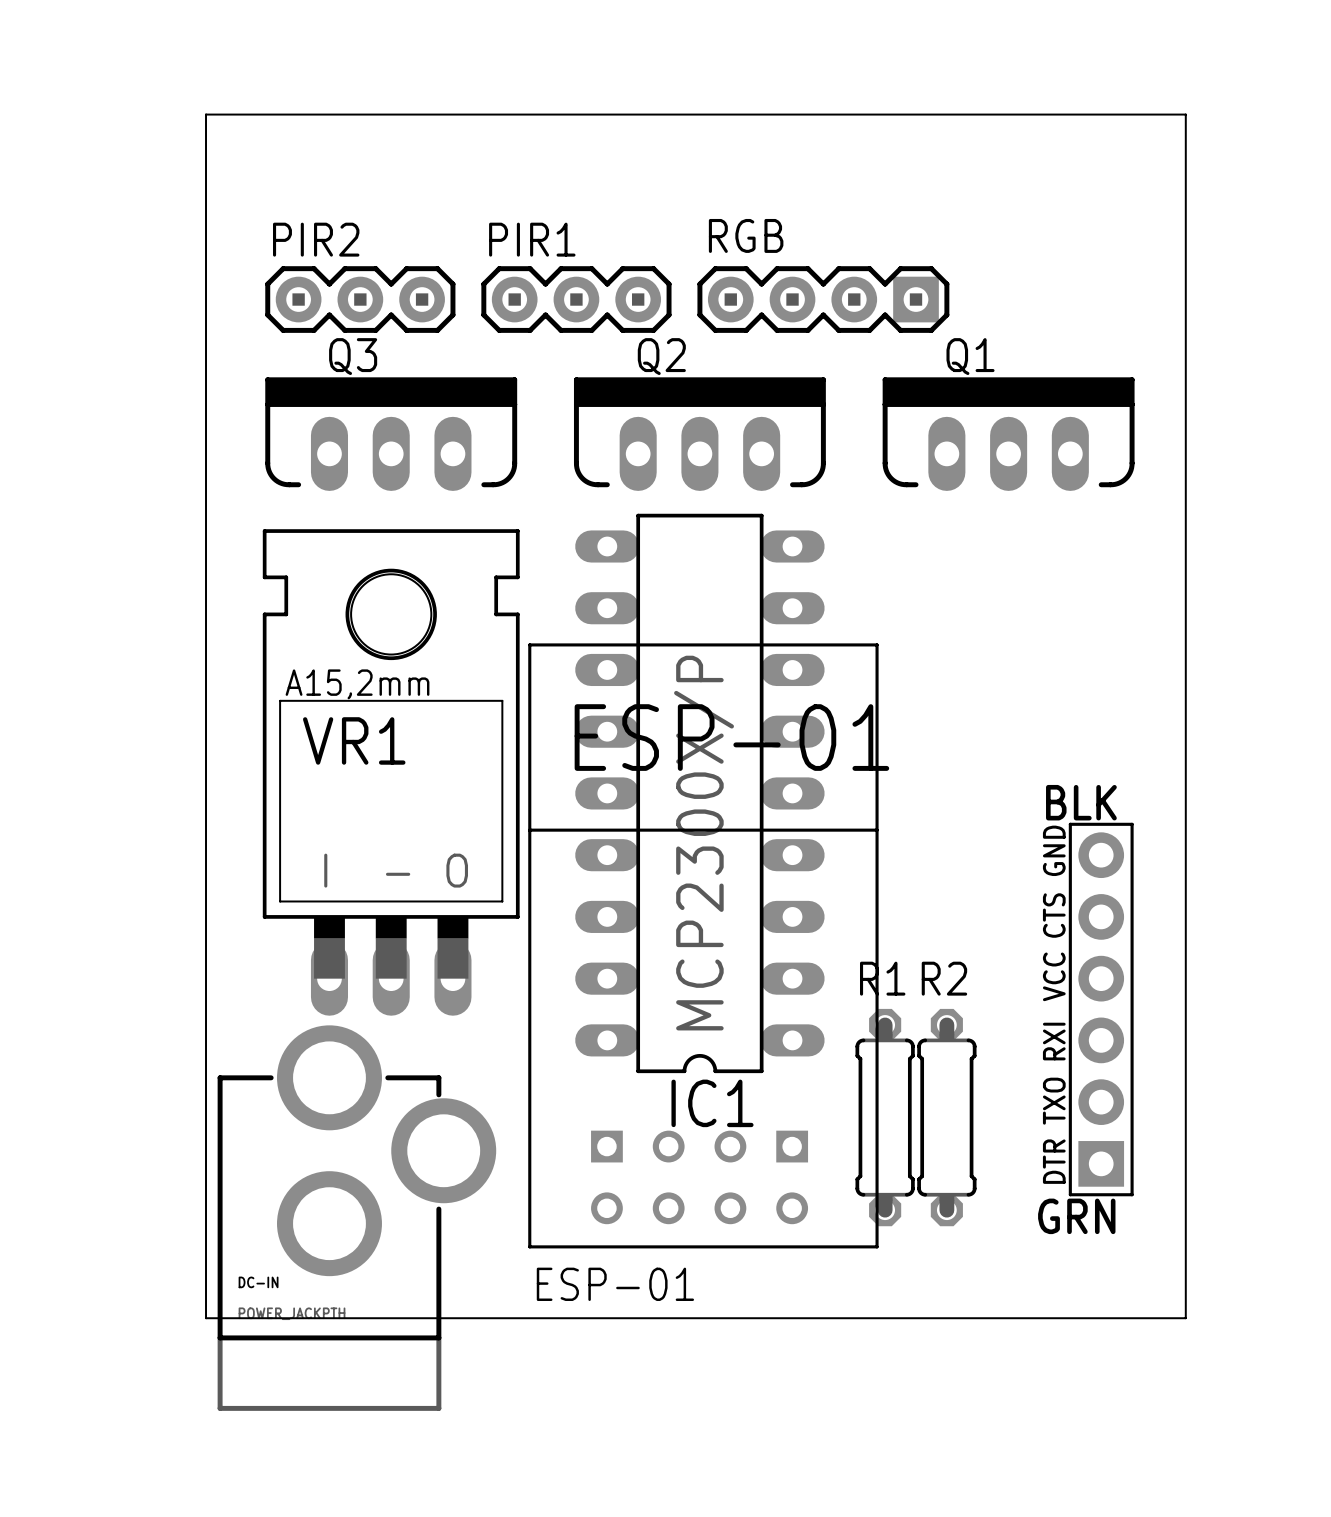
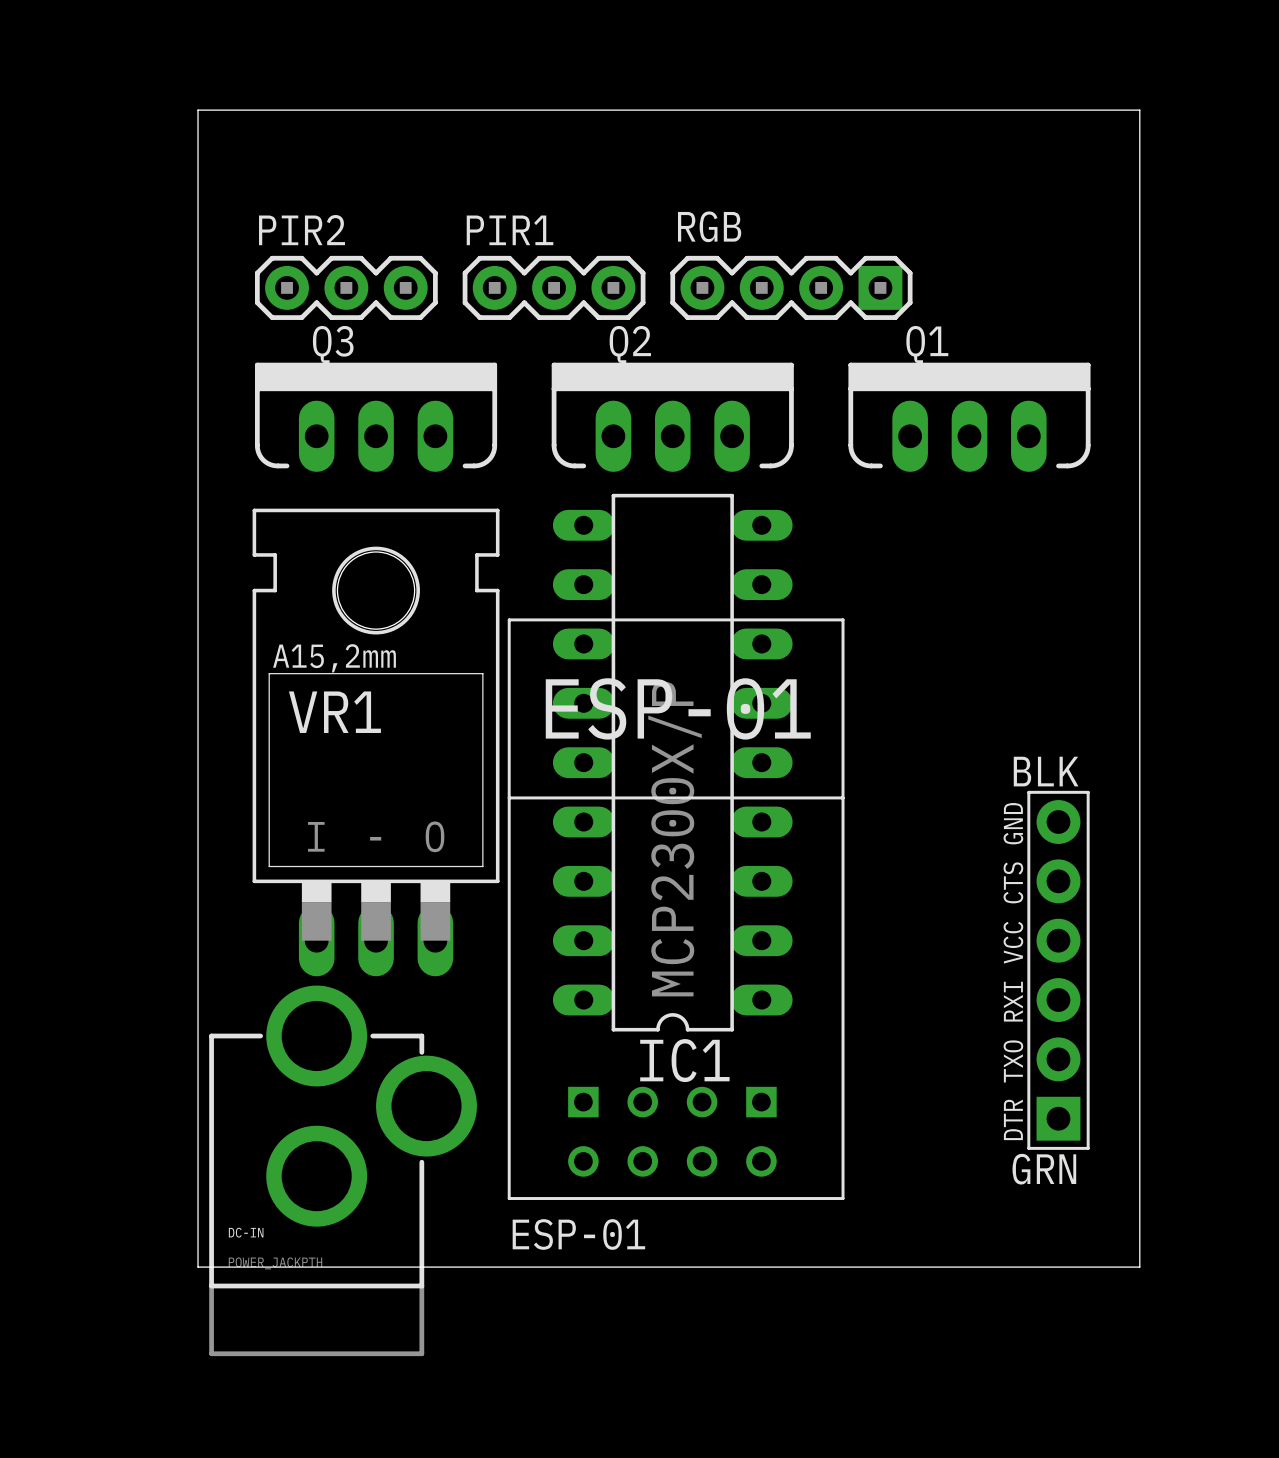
R1: (885, 1117) -> none
R2: (946, 1117) -> none

